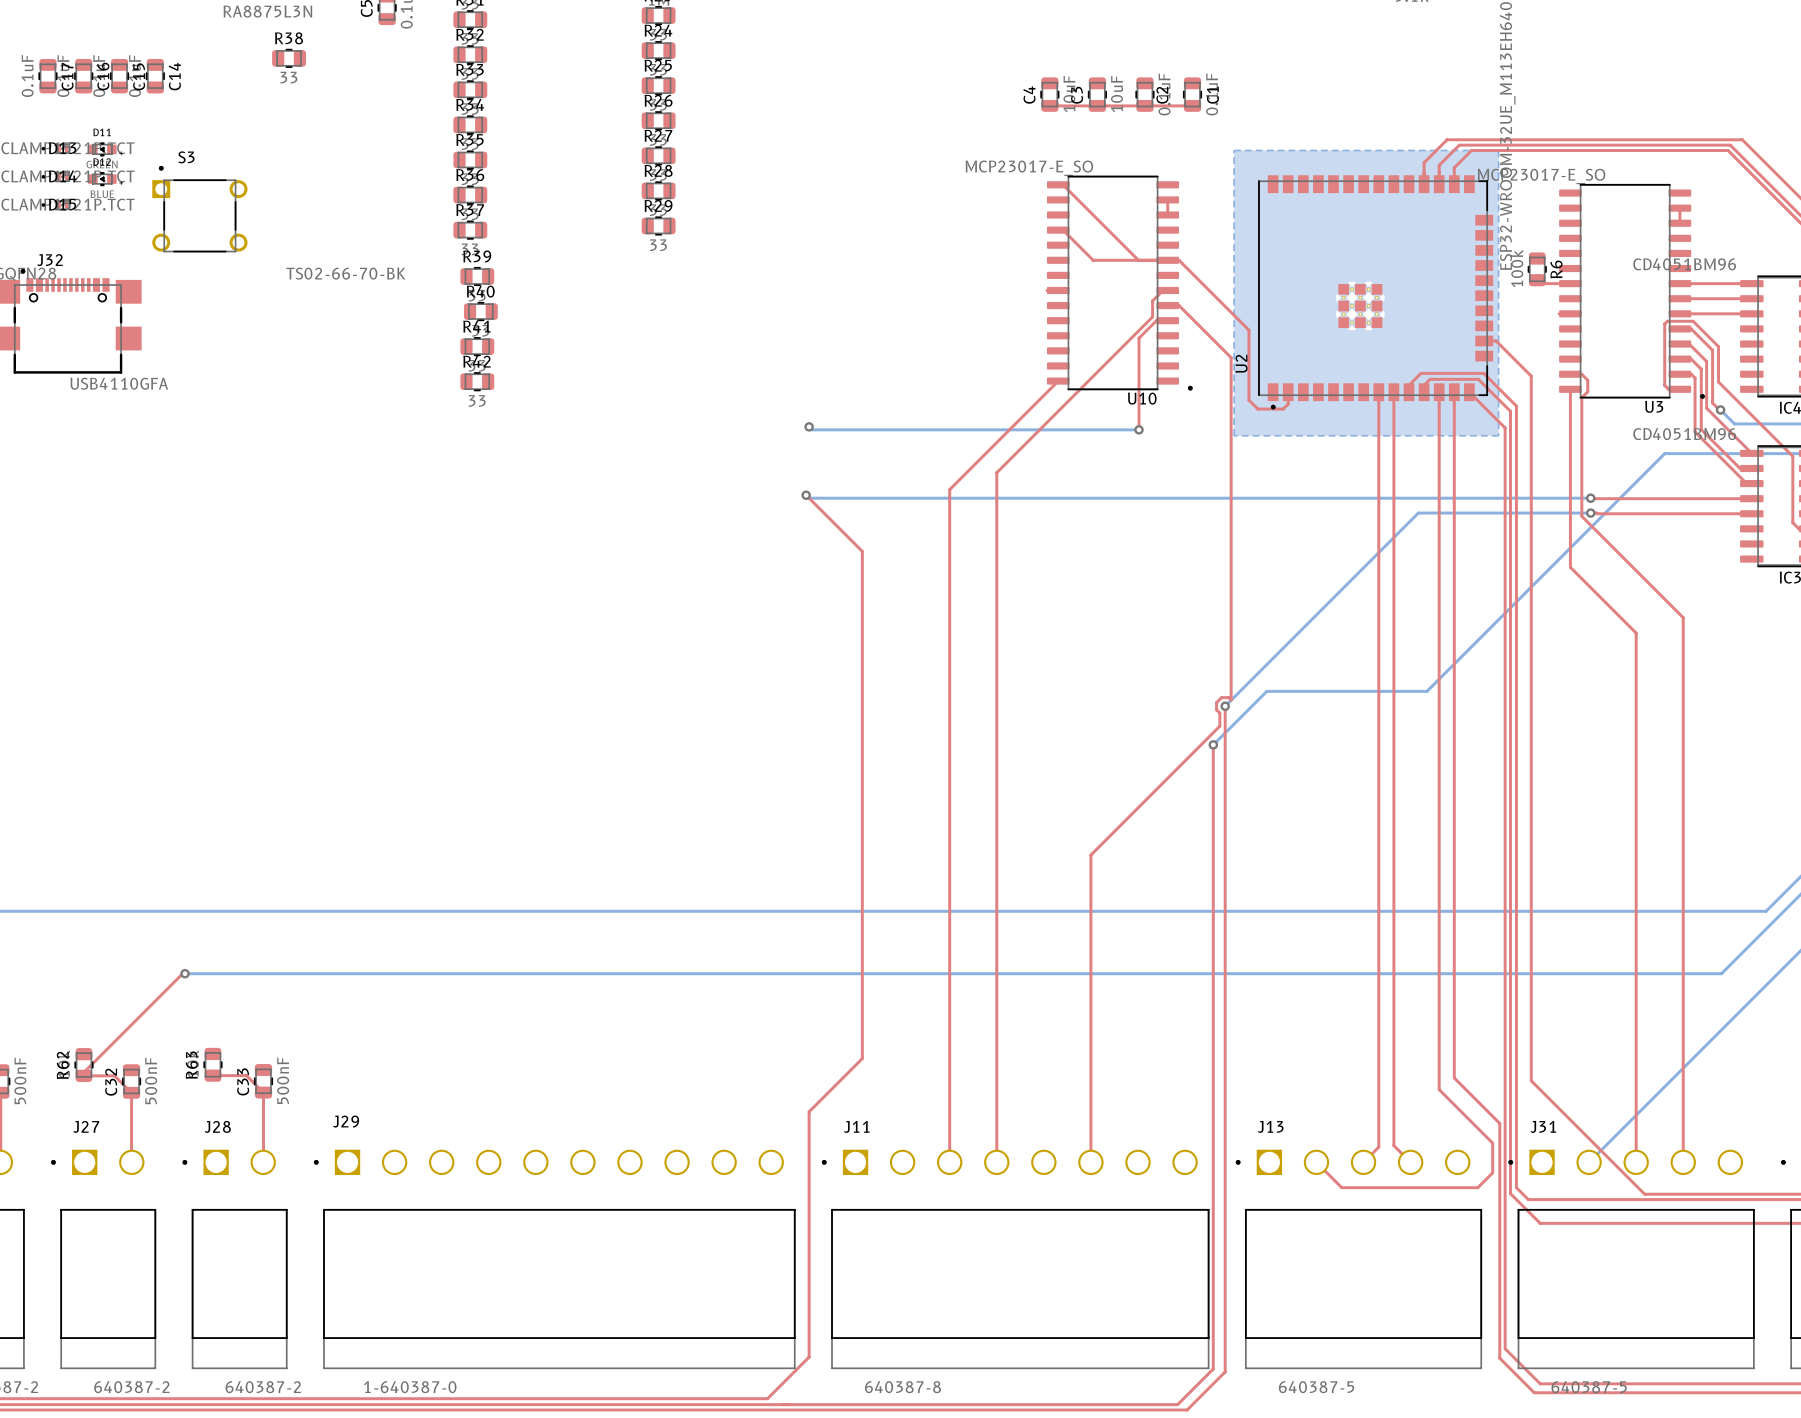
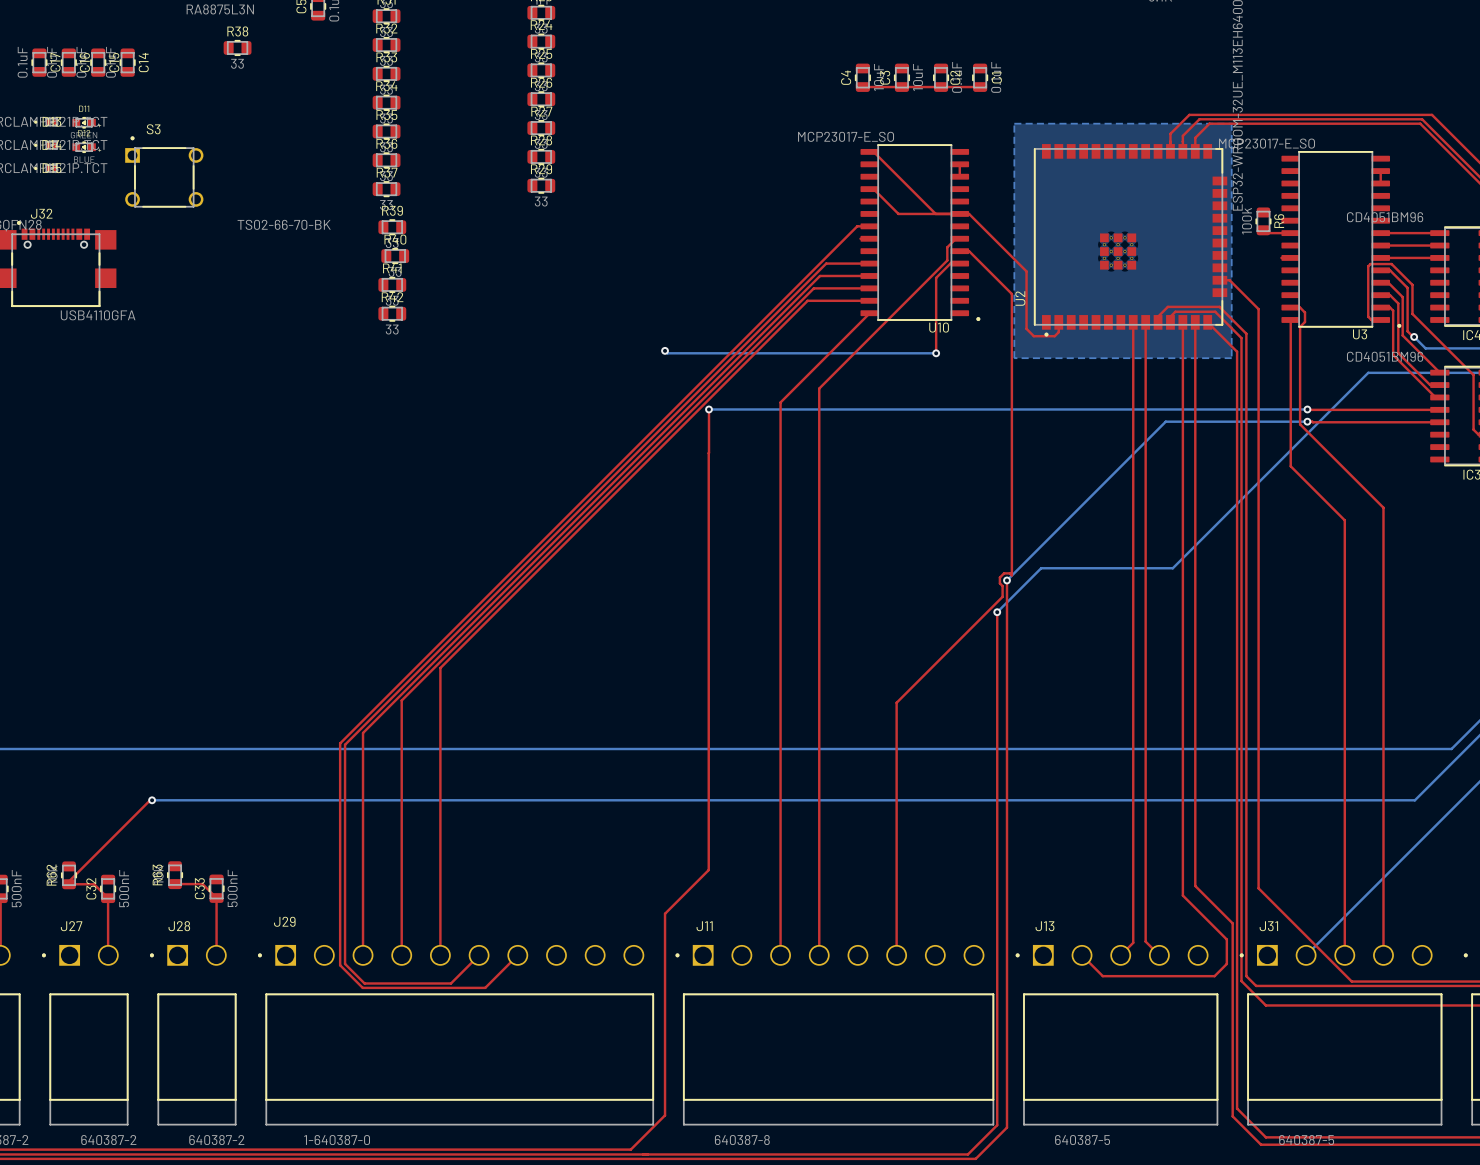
top track: none -> (869, 226) (857, 226) (340, 743) (340, 965) (362, 987) (485, 987) (517, 955)
top track: none -> (869, 263) (826, 263) (345, 744) (345, 963) (364, 983) (450, 983) (479, 955)
top track: none -> (869, 275) (820, 275) (363, 732) (363, 955)
top track: none -> (869, 288) (813, 288) (401, 700) (401, 955)
top track: none -> (869, 300) (807, 300) (440, 668) (440, 955)
top track: (806, 495) (862, 551) -> (709, 409) (708, 453)
bottom track: (806, 495) (809, 498) (862, 498) -> none
via position: (806, 495) -> (709, 409)

